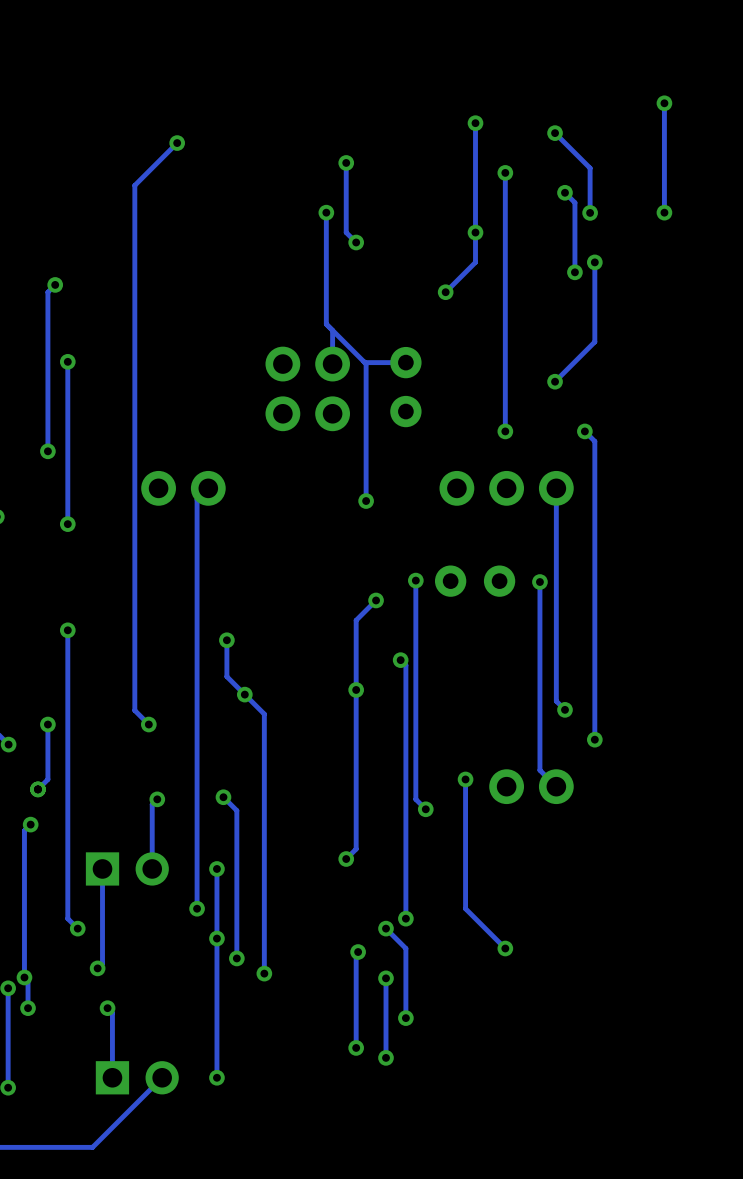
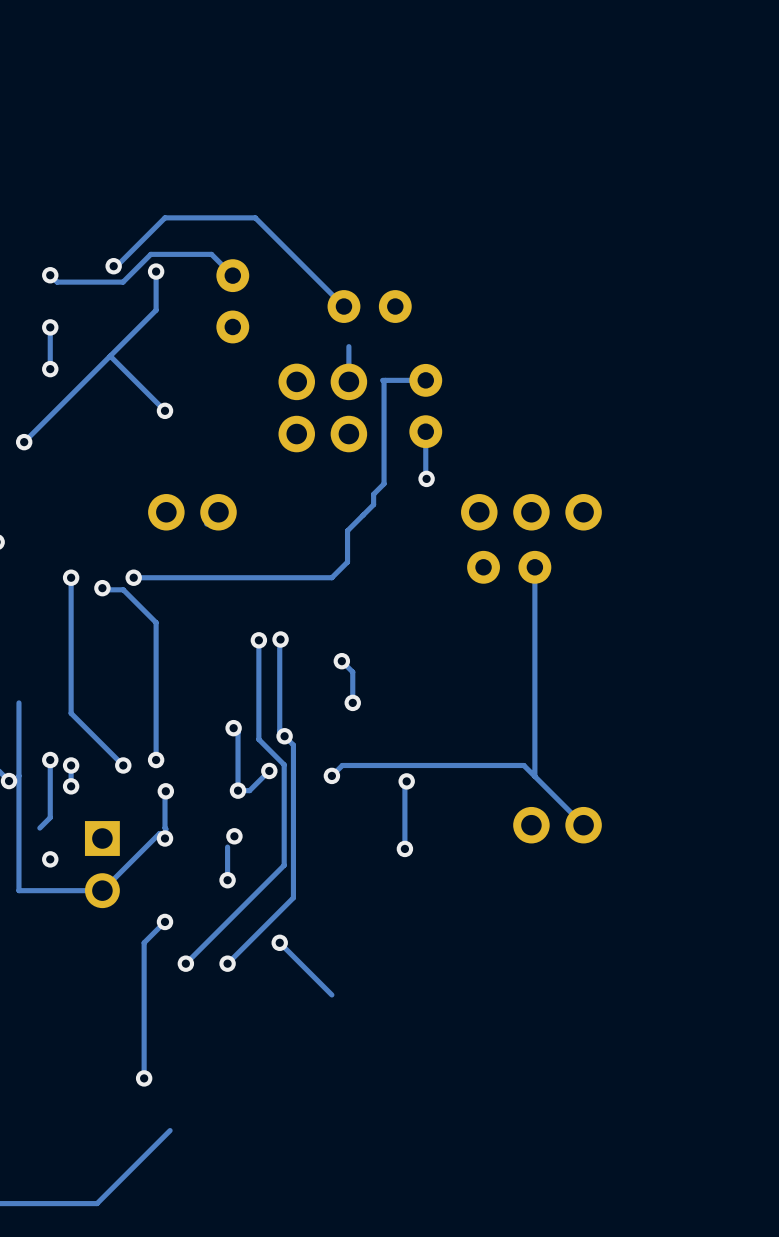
track: (664, 103) (664, 212) -> none
via: (664, 103) -> none
track: (475, 123) (475, 262) (445, 292) -> none
via: (475, 123) -> none
track: (555, 133) (590, 168) (590, 212) -> none
via: (555, 133) -> none
track: (177, 143) (134, 185) (134, 710) (148, 724) -> (102, 588) (104, 589) (123, 589) (156, 622) (156, 760)
via: (177, 143) -> none
track: (346, 162) (346, 232) (356, 242) -> none
via: (346, 162) -> none
track: (505, 172) (505, 431) -> none
via: (505, 172) -> none
track: (564, 192) (574, 202) (574, 272) -> none
via: (564, 192) -> none
track: (326, 212) (326, 324) (366, 363) -> none
via: (326, 212) -> none
via: (590, 212) -> none
via: (664, 212) -> none
via: (475, 232) -> none
via: (356, 242) -> none
track: none -> (113, 266) (116, 266) (165, 217) (255, 217) (343, 306)
via: none -> (113, 266)
track: none -> (156, 271) (156, 310) (24, 442)
via: none -> (156, 271)
track: none -> (50, 275) (57, 282) (123, 282) (150, 254) (211, 254) (232, 275)
via: none -> (50, 275)
track: (594, 262) (594, 341) (555, 381) -> none
via: (594, 262) -> none
via: (574, 272) -> none
track: (55, 284) (47, 292) (47, 312) -> none
via: (55, 284) -> none
part: none -> (232, 301)
part: none -> (369, 306)
via: (445, 292) -> none
via: none -> (50, 327)
track: none -> (110, 356) (165, 410)
track: (47, 351) (47, 451) -> none
track: (67, 361) (67, 524) -> none
via position: (67, 361) -> (50, 369)
via: (555, 381) -> none
via: none -> (165, 410)
track: none -> (425, 431) (426, 478)
via: none -> (24, 442)
via: (505, 431) -> none
track: (584, 431) (594, 441) (594, 739) -> none
via: (584, 431) -> none
via: (47, 451) -> none
via: none -> (426, 478)
track: (366, 461) (366, 501) -> (384, 483) (373, 494) (373, 504) (347, 530) (347, 562) (331, 577) (133, 577)
track: (556, 488) (556, 701) (564, 709) -> none
track: (197, 499) (197, 908) -> none
via: (366, 501) -> none
via: (67, 524) -> none
track: none -> (534, 567) (534, 776)
track: none -> (71, 577) (71, 661)
via: none -> (71, 577)
via: none -> (133, 577)
via: none -> (102, 588)
track: (415, 580) (415, 799) (425, 809) -> none
via: (415, 580) -> none
part position: (475, 581) -> (509, 567)
track: (539, 582) (539, 770) -> (331, 775) (342, 765) (523, 765) (566, 808)
via: (539, 582) -> none
track: (376, 600) (356, 620) (356, 849) (346, 859) -> none
via: (376, 600) -> none
track: none -> (280, 639) (279, 731) (293, 745) (293, 897) (227, 963)
via: none -> (280, 639)
track: none -> (258, 640) (258, 739) (284, 764) (284, 865) (185, 963)
via: none -> (258, 640)
via: (67, 630) -> none
track: none -> (341, 661) (352, 672) (352, 702)
via: none -> (341, 661)
track: (226, 640) (226, 676) (264, 714) (264, 973) -> none
via: (226, 640) -> none
track: (400, 660) (405, 665) (405, 918) -> none
via: (400, 660) -> none
track: none -> (18, 702) (18, 890) (102, 890) (159, 833) (165, 833) (165, 791)
track: (67, 680) (67, 729) -> (71, 713) (123, 765)
via position: (356, 689) -> (352, 702)
track: none -> (233, 728) (238, 732) (238, 790) (249, 790) (269, 770)
via: none -> (233, 728)
via: (244, 694) -> none
via: none -> (284, 736)
via: (564, 709) -> none
via: none -> (71, 765)
via: none -> (123, 765)
via: none -> (269, 770)
via: none -> (331, 775)
via: (594, 739) -> none
track: none -> (406, 781) (404, 783) (404, 848)
via: none -> (406, 781)
track: (67, 749) (67, 918) (77, 928) -> none
via: none -> (71, 786)
via: none -> (238, 790)
via: none -> (165, 791)
track: (465, 779) (465, 908) (505, 948) -> none
via: (465, 779) -> none
via: (37, 789) -> none
track: (223, 797) (236, 810) (236, 958) -> none
track: (157, 799) (152, 804) (152, 868) -> none
track: none -> (227, 847) (227, 880)
via: none -> (404, 848)
via: (425, 809) -> none
via: none -> (50, 859)
track: (30, 824) (24, 830) (24, 977) (28, 981) (28, 1008) -> none
via: (30, 824) -> none
via: none -> (227, 880)
via: (346, 859) -> none
track: (102, 868) (102, 963) (97, 968) -> none
part rotation: 0° (127, 868) -> 90° clockwise (102, 864)
part position: (127, 868) -> (102, 864)
track: (216, 868) (216, 1077) -> none
via: (216, 868) -> none
track: none -> (165, 921) (144, 942) (144, 1078)
via: none -> (165, 921)
track: none -> (279, 942) (331, 994)
via: none -> (279, 942)
via: (197, 908) -> none
via: none -> (185, 963)
via: none -> (227, 963)
via: (405, 918) -> none
via: (77, 928) -> none
track: (386, 928) (405, 948) (405, 1018) -> none
via: (386, 928) -> none
via: (216, 938) -> none
via: (505, 948) -> none
track: (358, 952) (356, 953) (356, 1047) -> none
via: (358, 952) -> none
via: (236, 958) -> none
via: (97, 968) -> none
via: (264, 973) -> none
via: (24, 977) -> none
track: (386, 978) (386, 1057) -> none
via: (386, 978) -> none
track: (8, 988) (8, 1087) -> none
via: (8, 988) -> none
via: (28, 1008) -> none
track: (107, 1008) (112, 1013) (112, 1077) -> none
via: (107, 1008) -> none
via: (405, 1018) -> none
via: none -> (144, 1078)
via: (356, 1047) -> none
via: (386, 1057) -> none
part: (137, 1077) -> none
via: (216, 1077) -> none
via: (8, 1087) -> none

